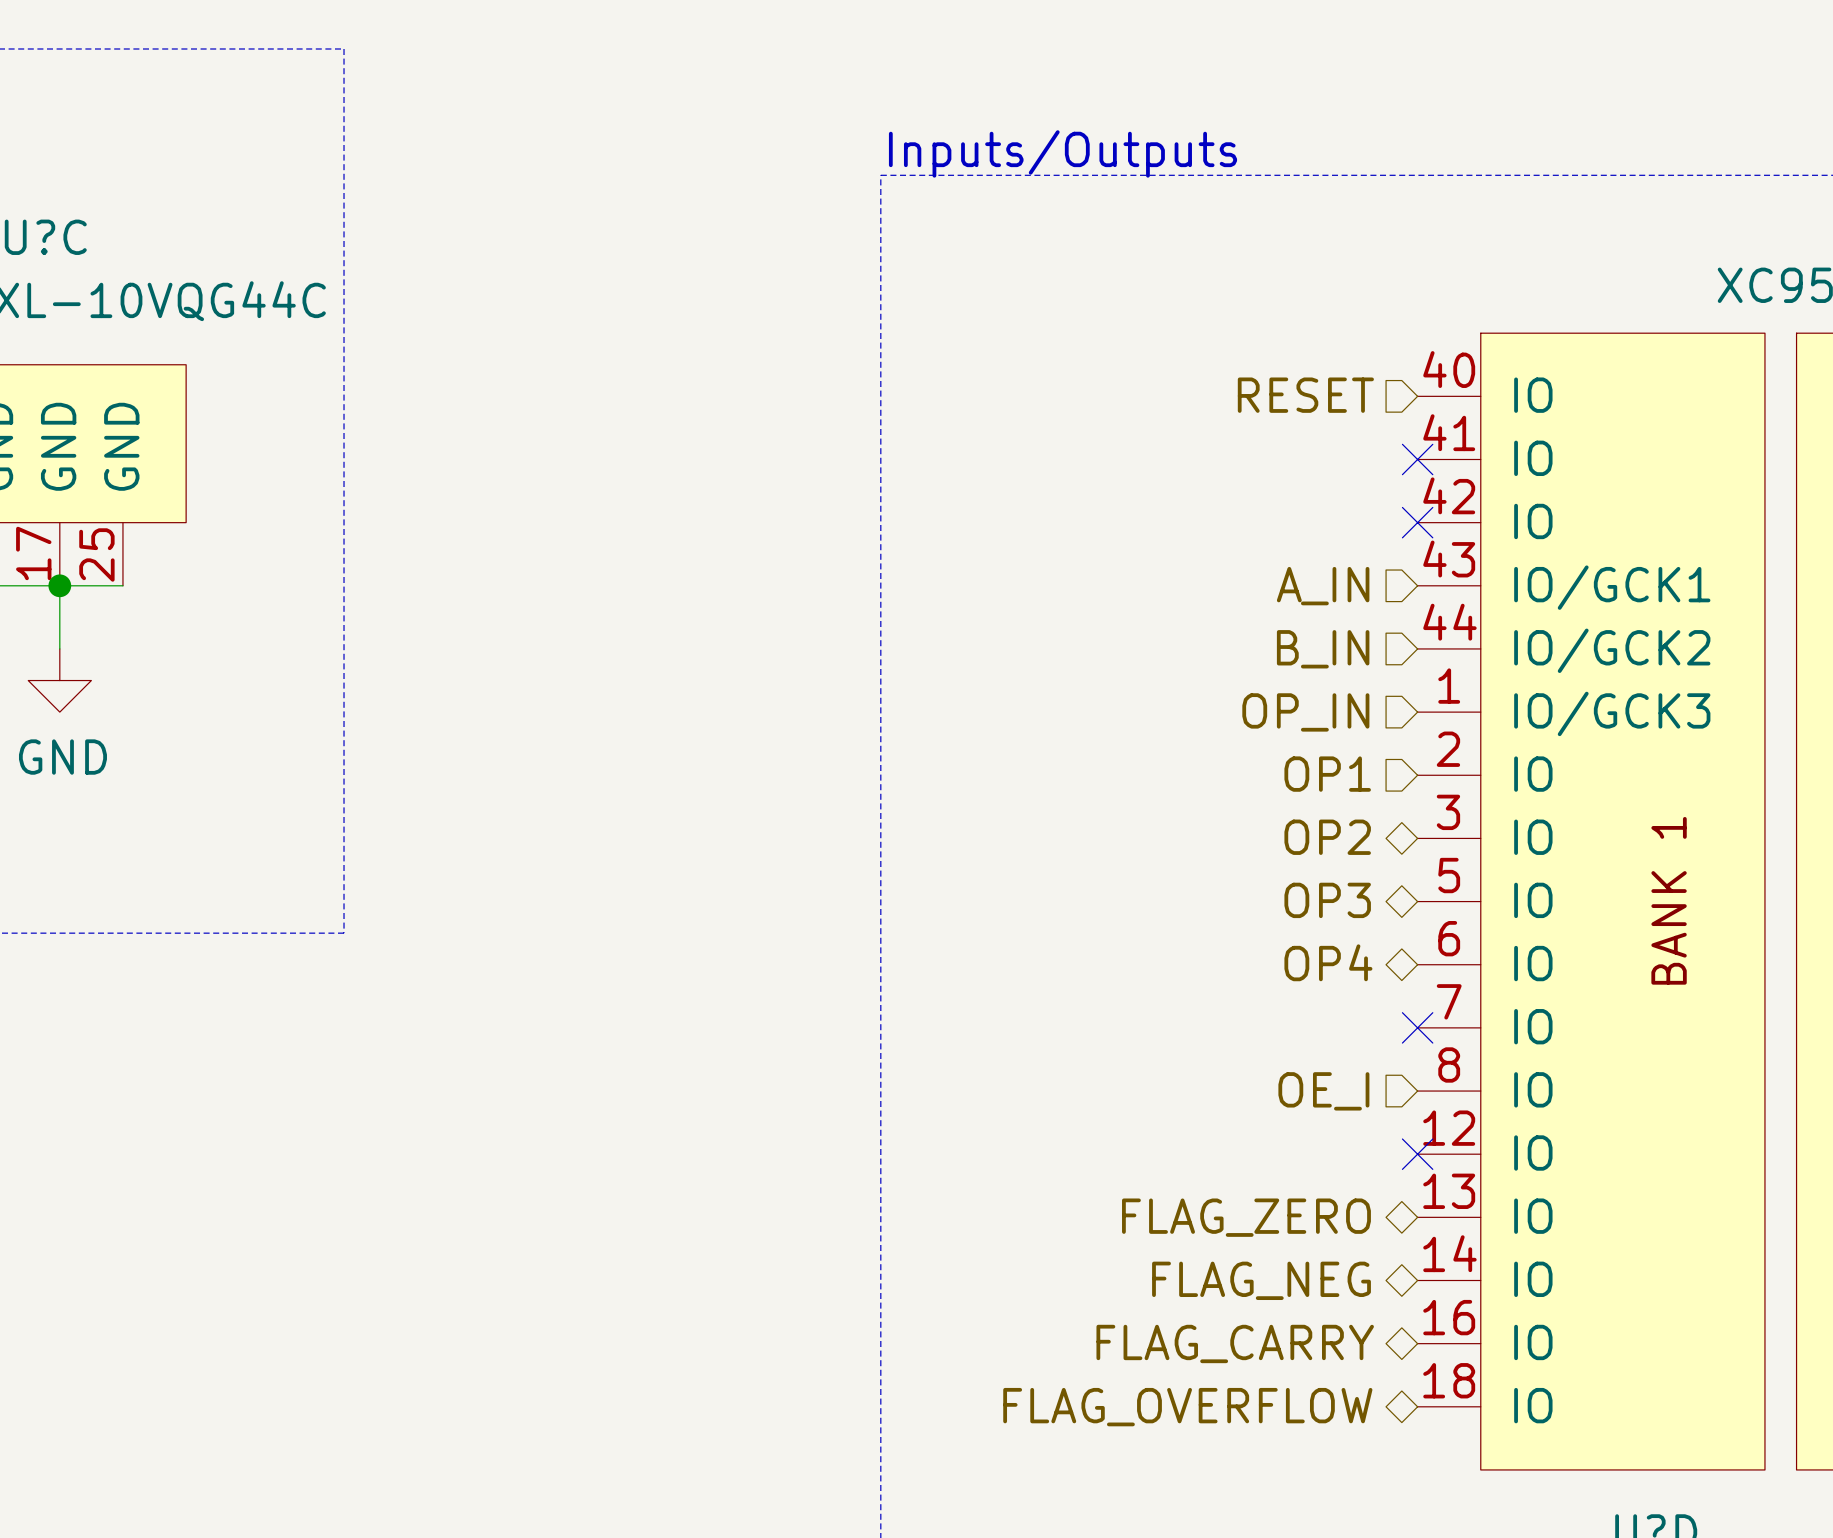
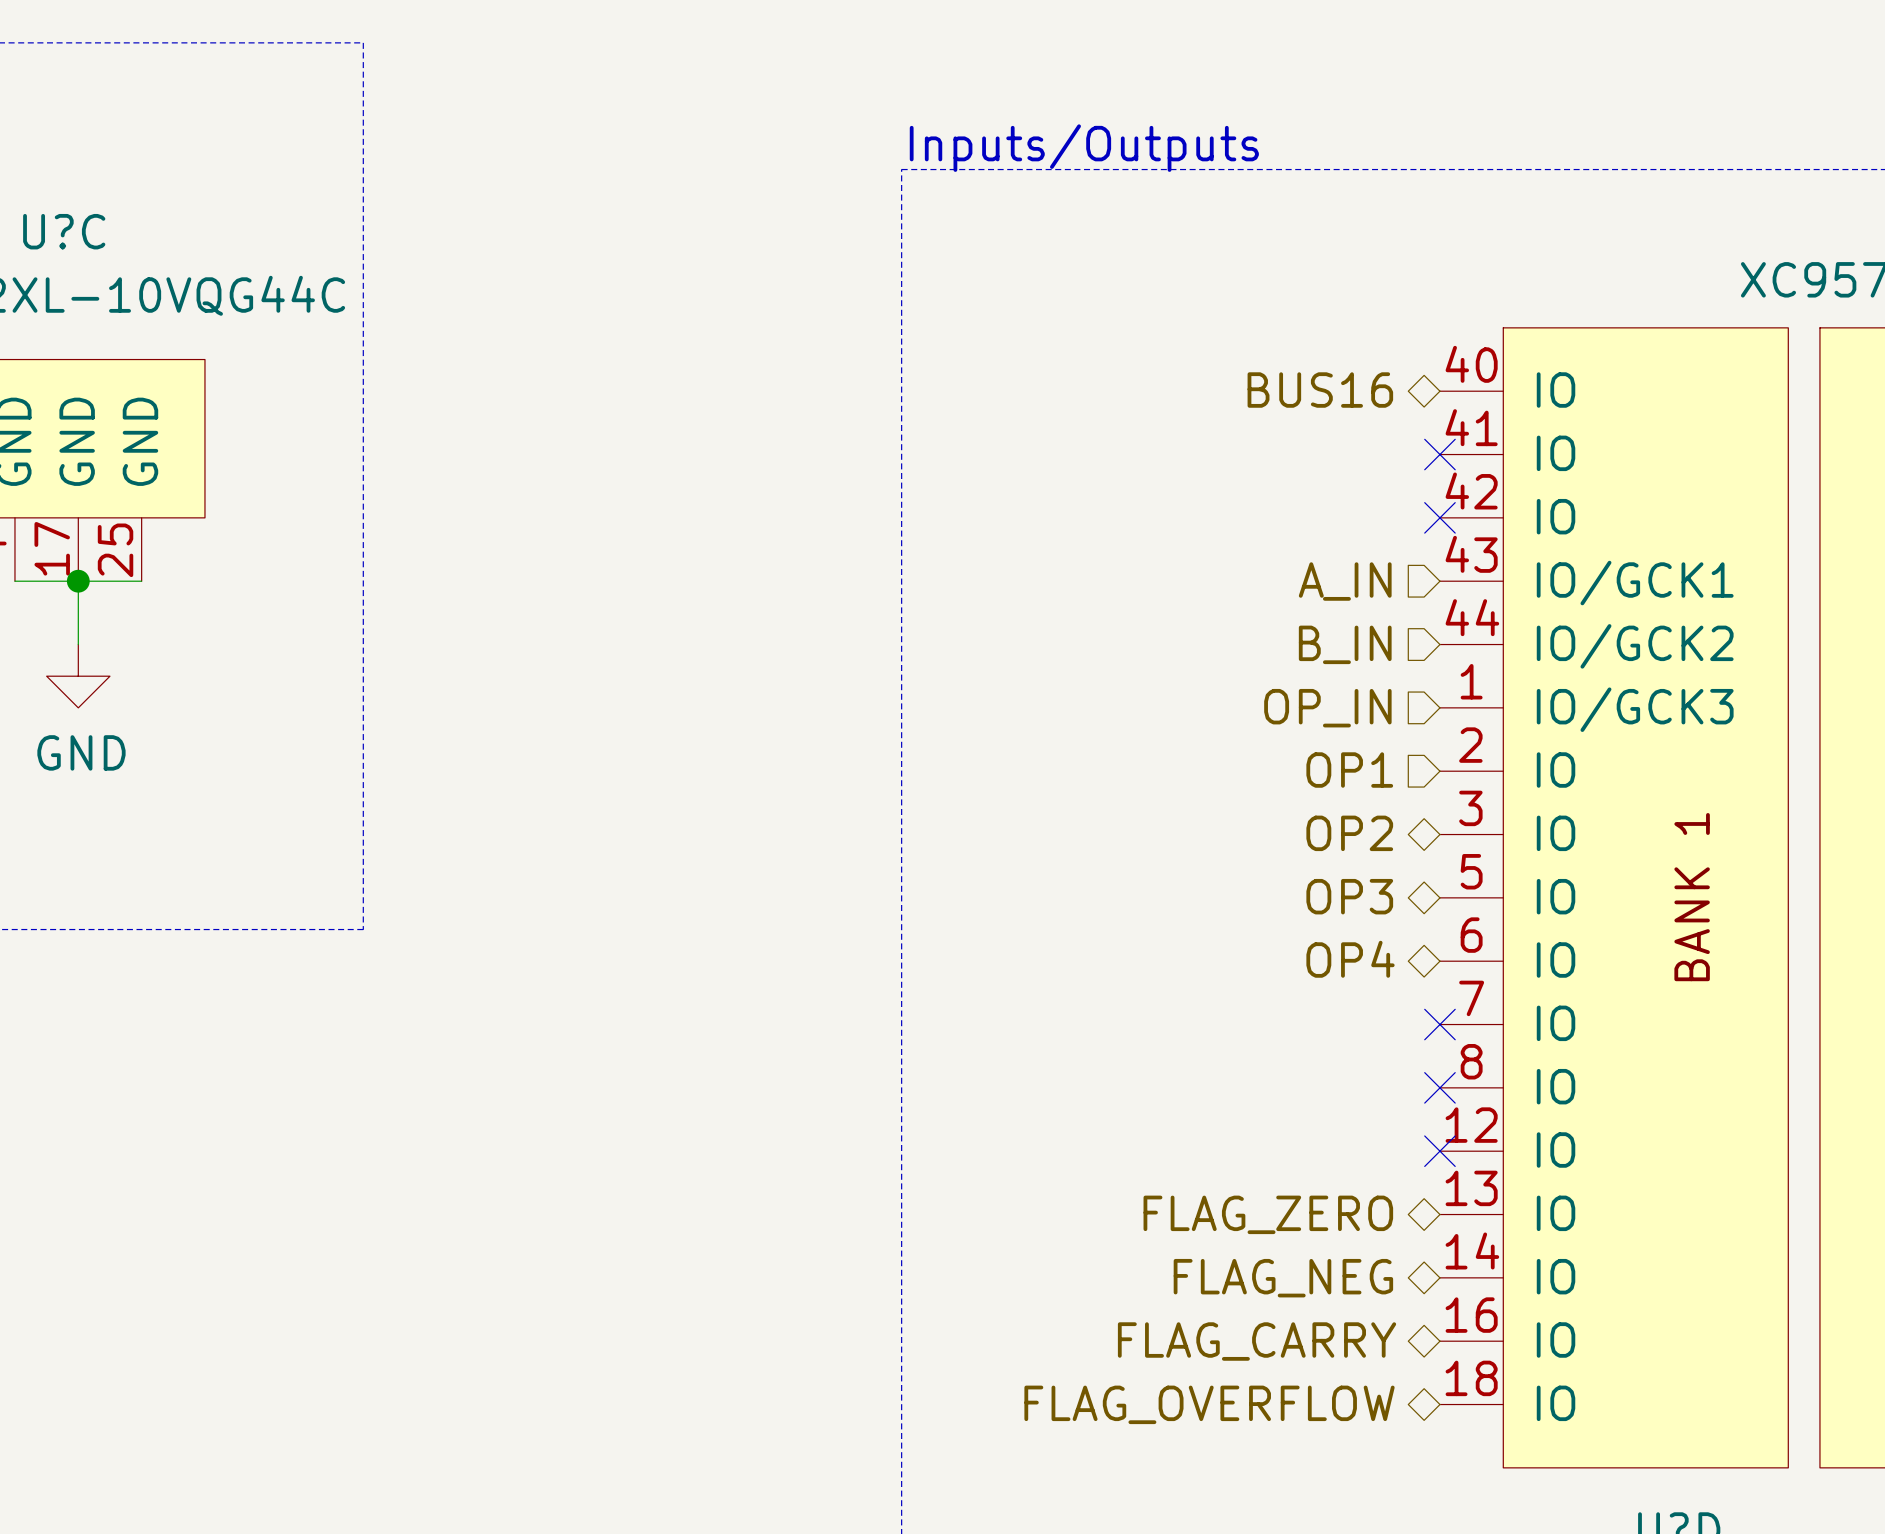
hierarchical label shape: input (1305, 395) -> bidirectional (1320, 390)
hierarchical label: RESET (1305, 395) -> BUS16 (1320, 390)
hierarchical label: OE_I (1323, 1091) -> none
no-connect mark: none -> (1439, 1087)

